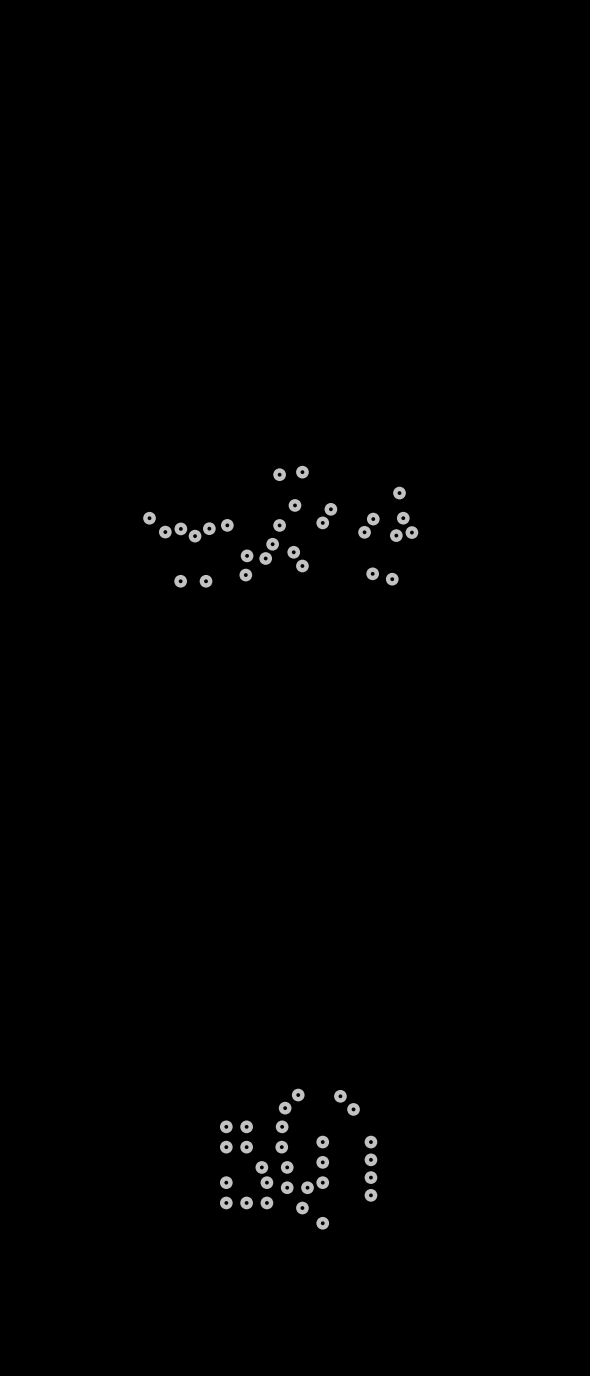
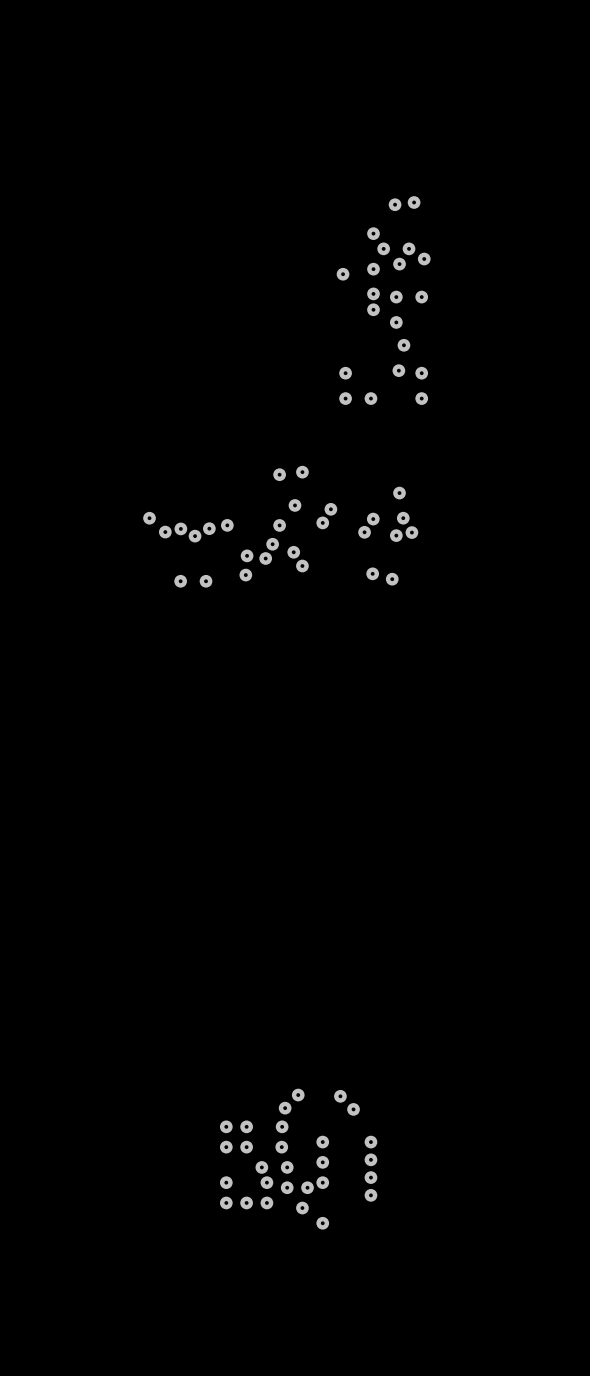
via: none -> (414, 202)
via: none -> (395, 204)
via: none -> (373, 233)
via: none -> (383, 248)
via: none -> (409, 248)
via: none -> (424, 259)
via: none -> (399, 264)
via: none -> (373, 269)
via: none -> (343, 274)
via: none -> (373, 293)
via: none -> (396, 297)
via: none -> (421, 297)
via: none -> (373, 309)
via: none -> (396, 322)
via: none -> (403, 345)
via: none -> (398, 370)
via: none -> (345, 373)
via: none -> (421, 373)
via: none -> (345, 398)
via: none -> (370, 398)
via: none -> (421, 398)

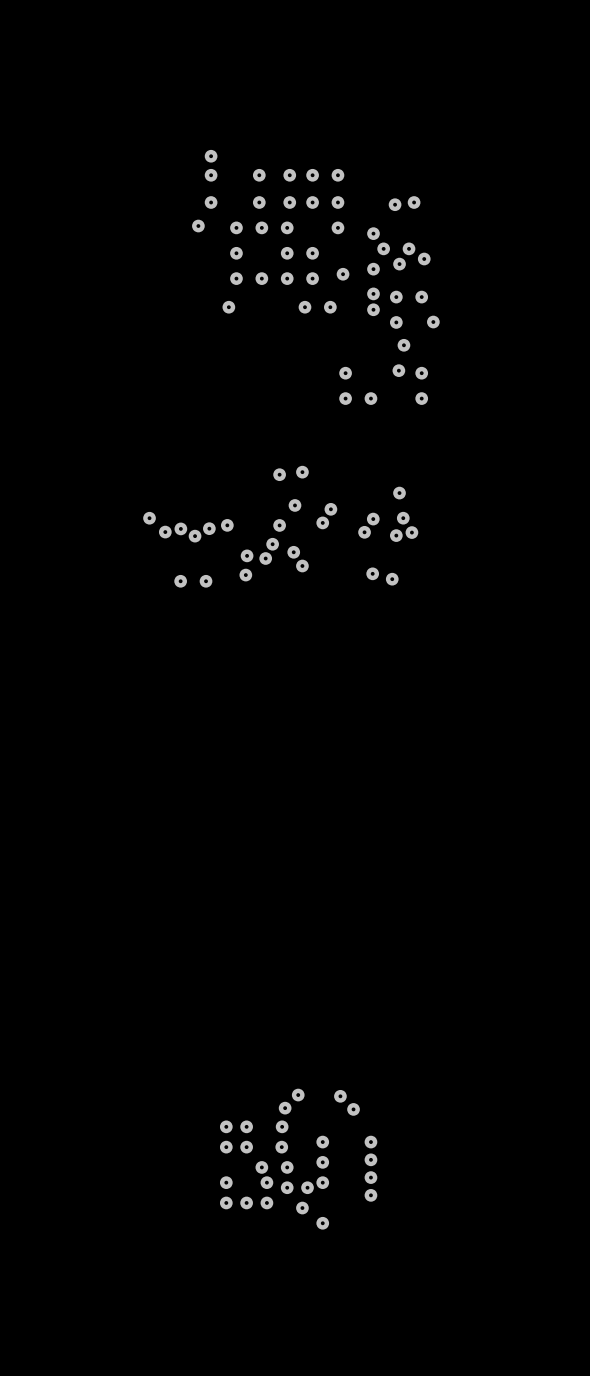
via: none -> (211, 156)
via: none -> (211, 175)
via: none -> (259, 175)
via: none -> (289, 175)
via: none -> (312, 175)
via: none -> (337, 175)
via: none -> (211, 202)
via: none -> (259, 202)
via: none -> (289, 202)
via: none -> (312, 202)
via: none -> (337, 202)
via: none -> (198, 226)
via: none -> (236, 227)
via: none -> (261, 227)
via: none -> (287, 227)
via: none -> (337, 227)
via: none -> (236, 253)
via: none -> (287, 253)
via: none -> (312, 253)
via: none -> (236, 278)
via: none -> (261, 278)
via: none -> (287, 278)
via: none -> (312, 278)
via: none -> (228, 307)
via: none -> (304, 307)
via: none -> (330, 307)
via: none -> (433, 322)

